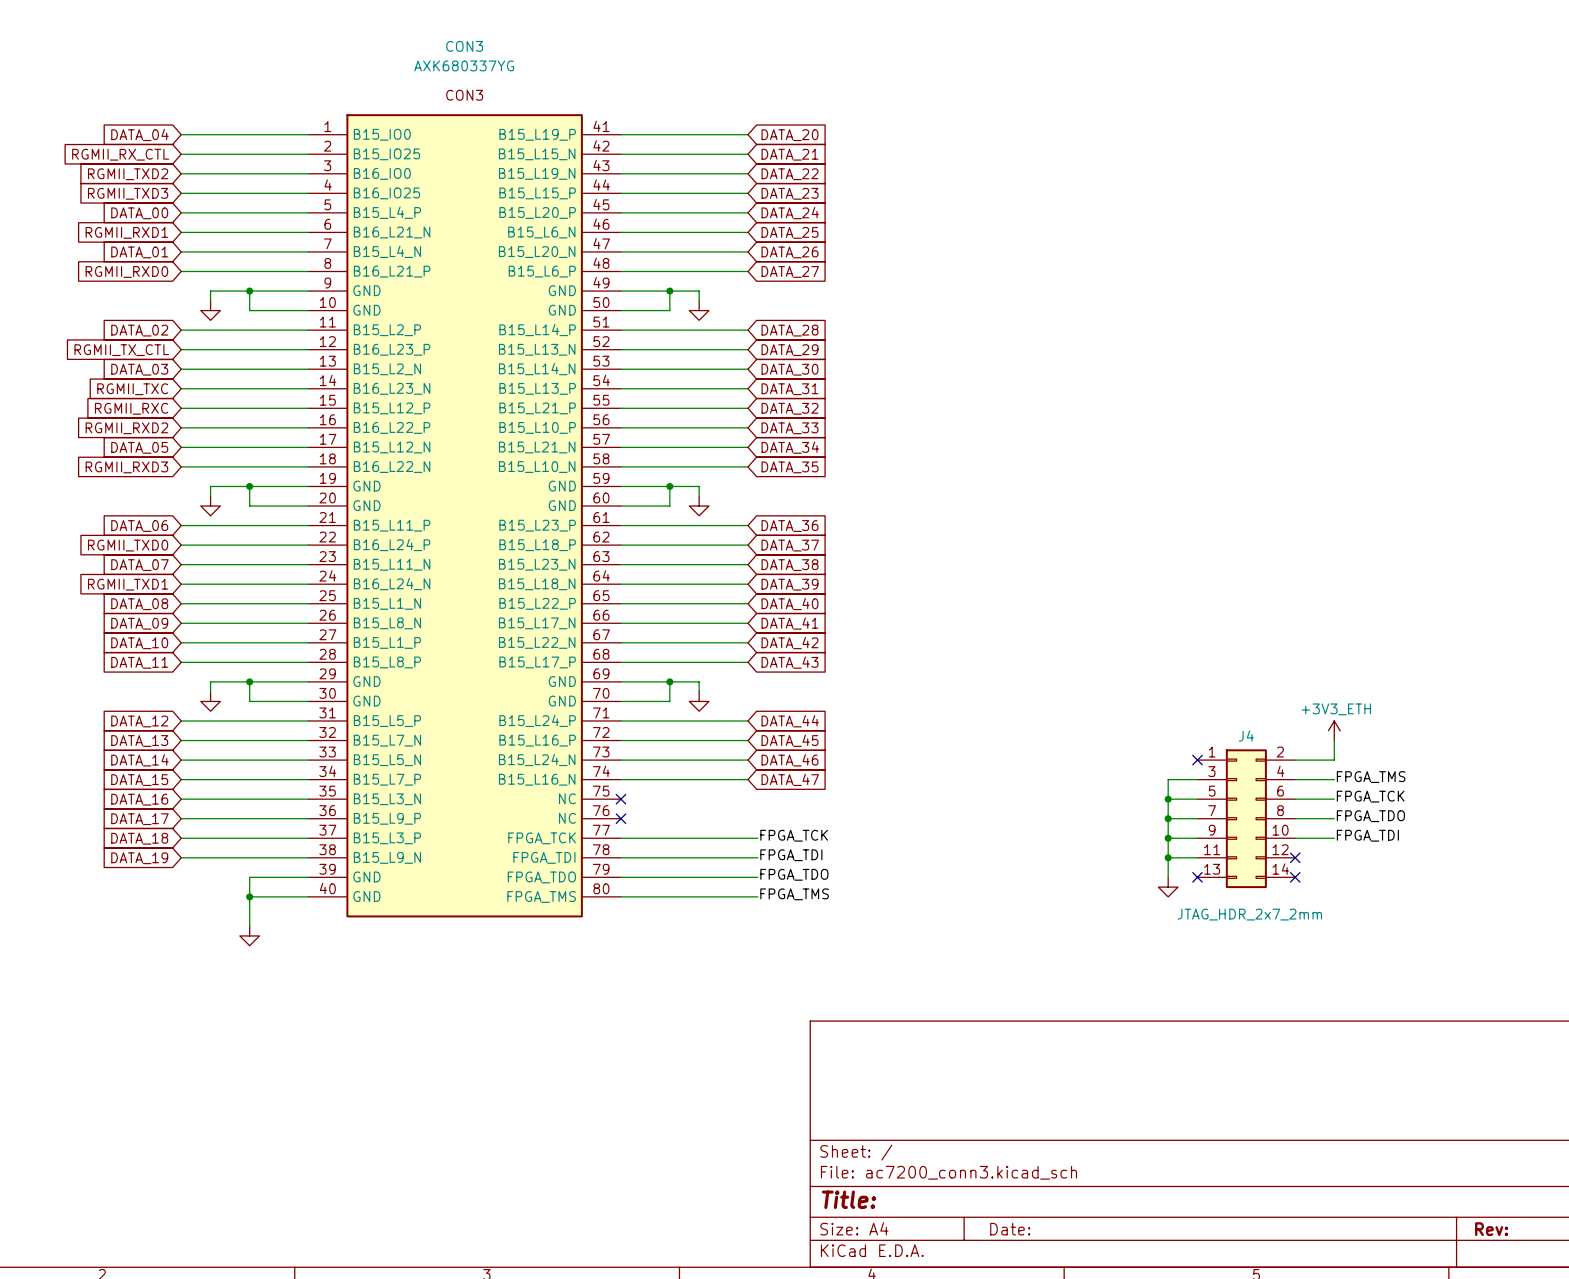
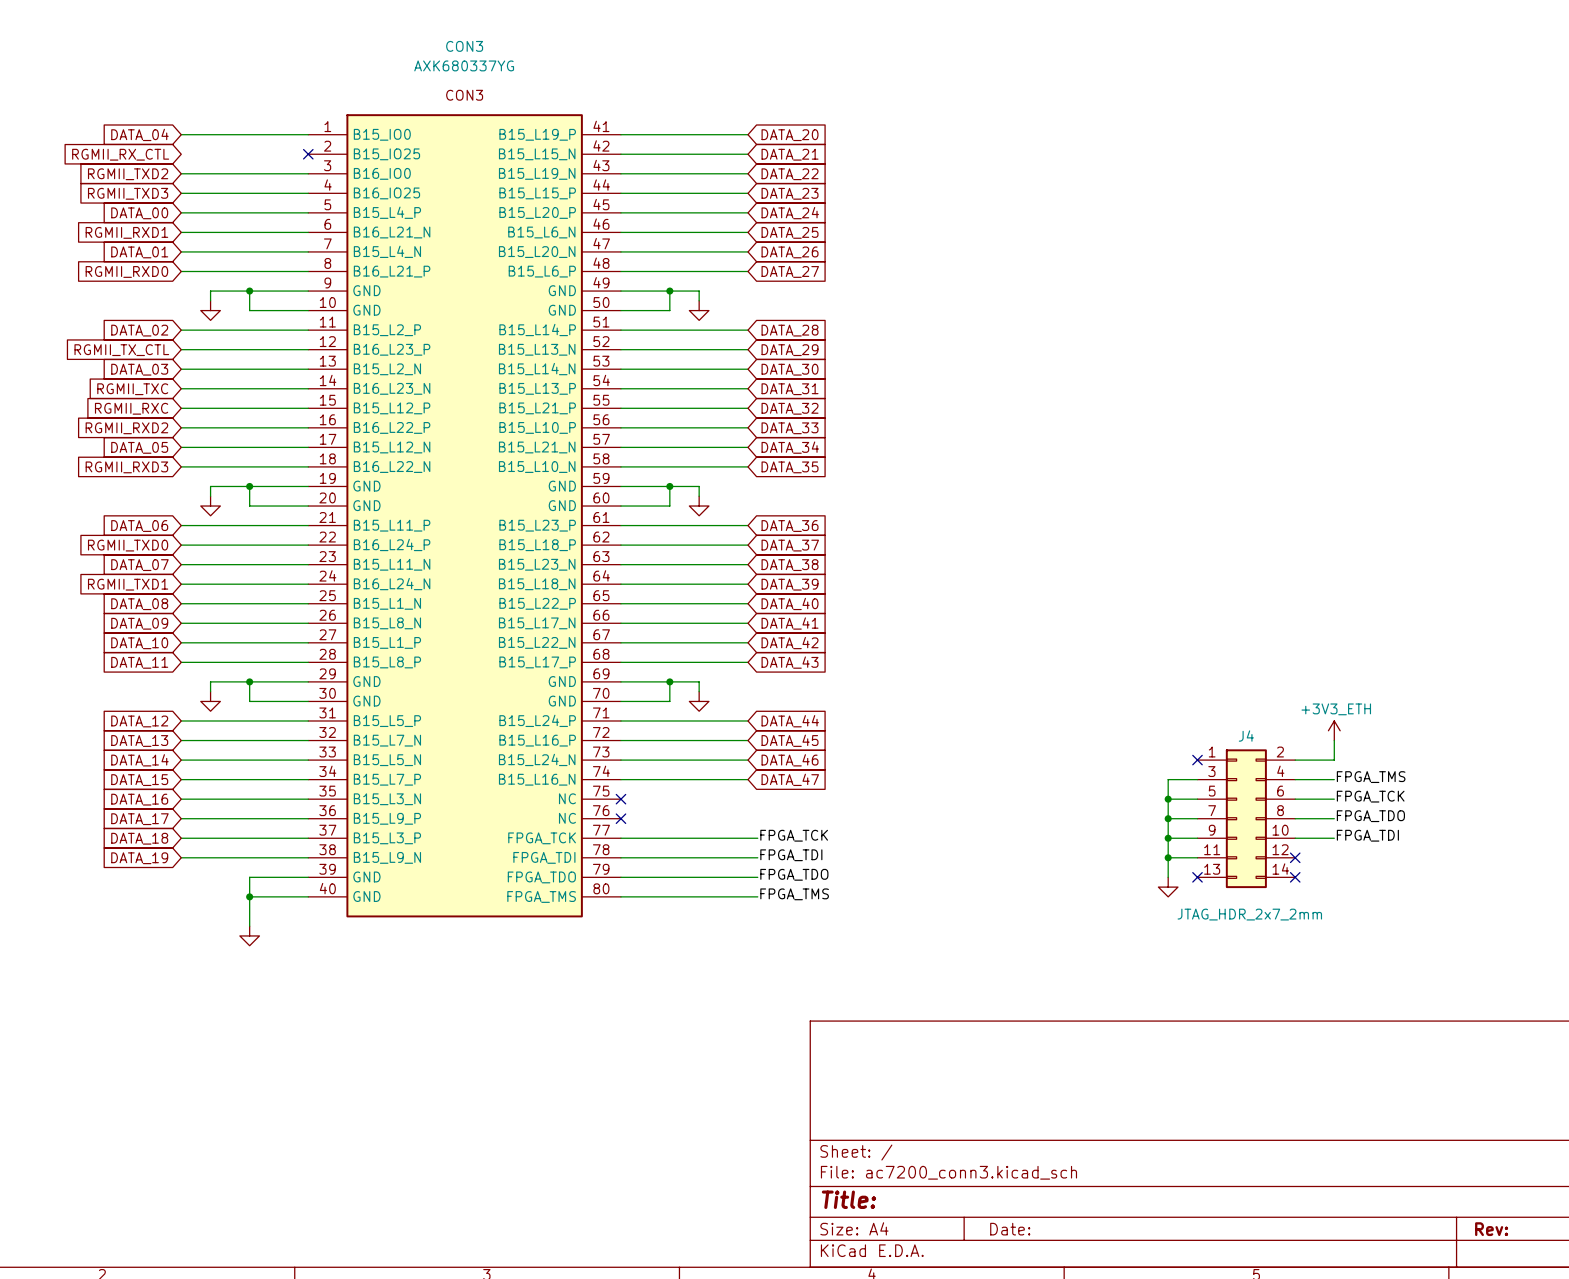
wire: (181, 154) (308, 154) -> none
no-connect mark: none -> (308, 154)

